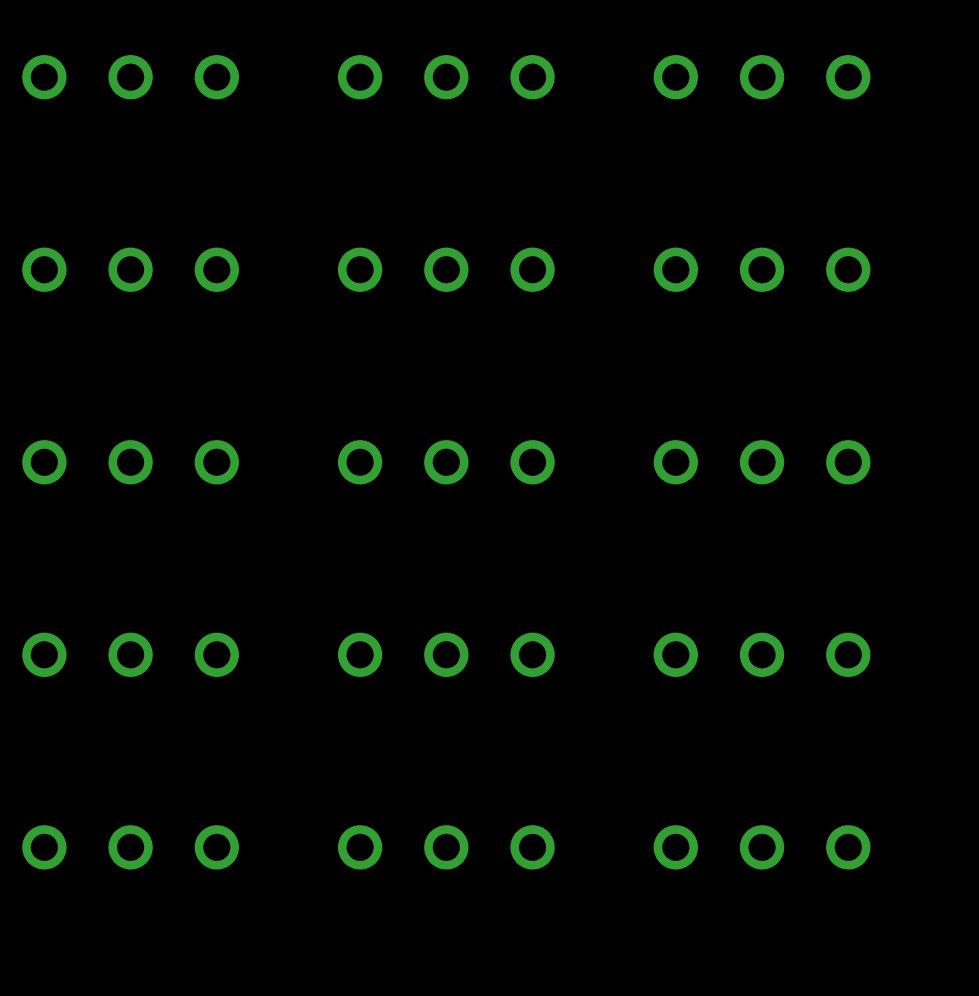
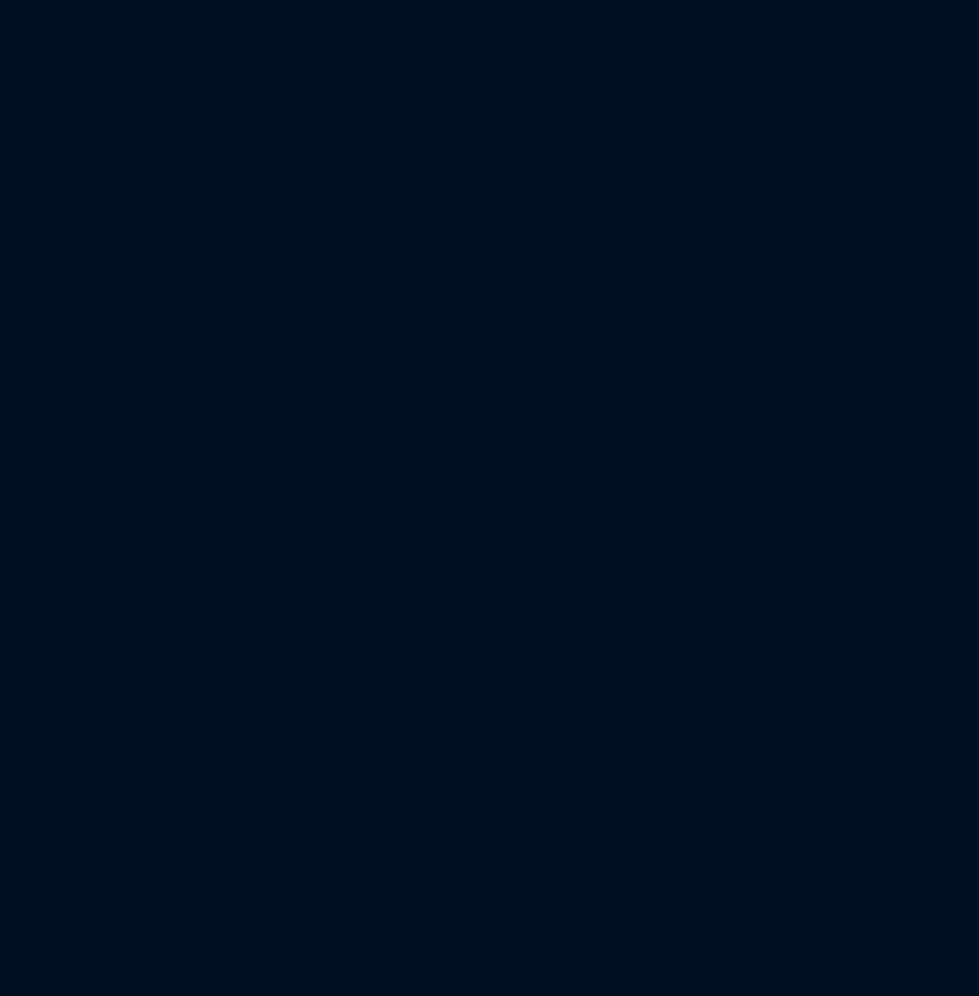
part: (130, 77) -> none
part: (446, 77) -> none
part: (762, 77) -> none
part: (130, 269) -> none
part: (446, 269) -> none
part: (762, 269) -> none
part: (130, 462) -> none
part: (446, 462) -> none
part: (762, 462) -> none
part: (130, 654) -> none
part: (446, 654) -> none
part: (762, 654) -> none
part: (130, 847) -> none
part: (446, 847) -> none
part: (762, 847) -> none

